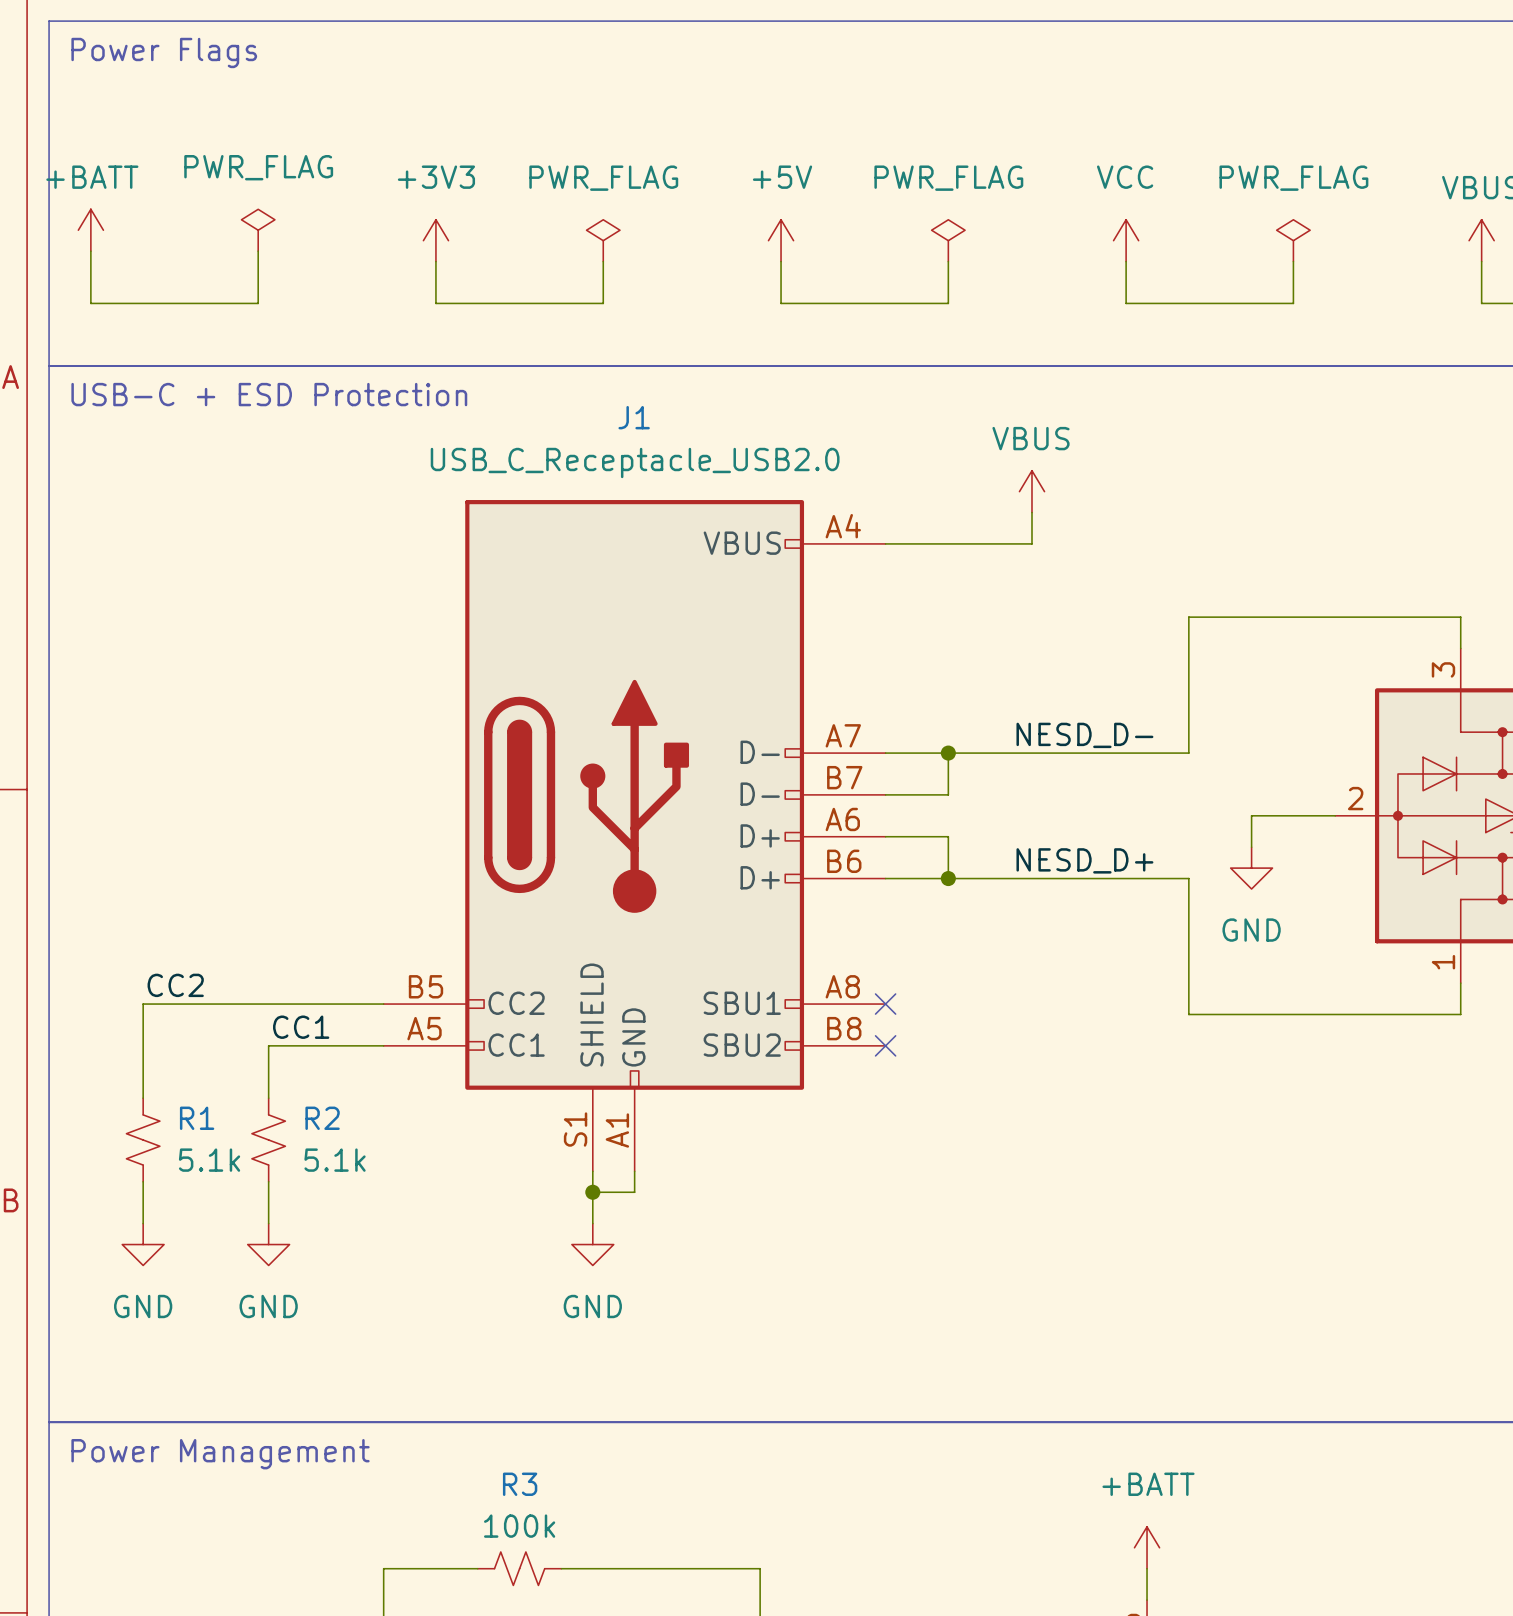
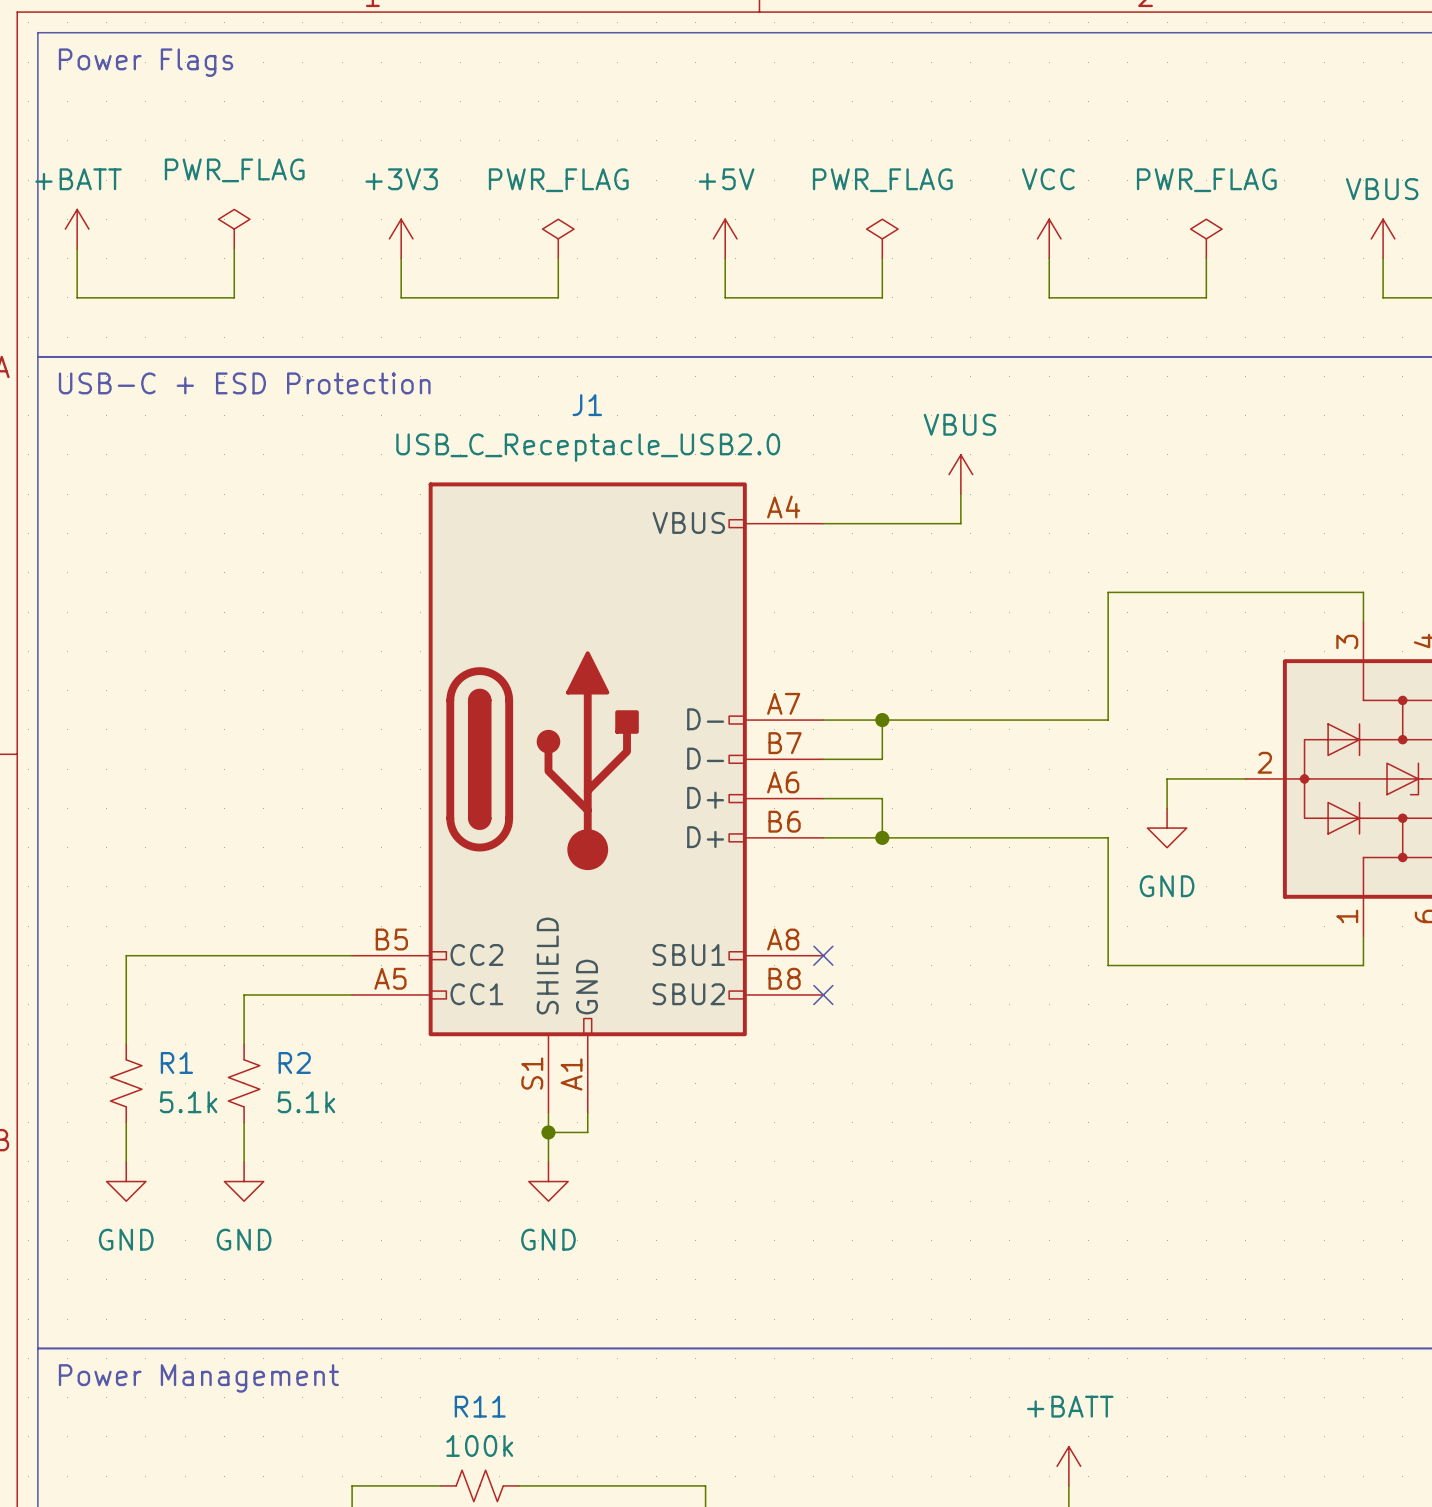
label: NESD_D- (1084, 735) -> none
label: NESD_D+ (1084, 860) -> none
label: CC2 (175, 985) -> none
label: CC1 (301, 1027) -> none
R3 name: R3 (520, 1484) -> R11 (480, 1406)

